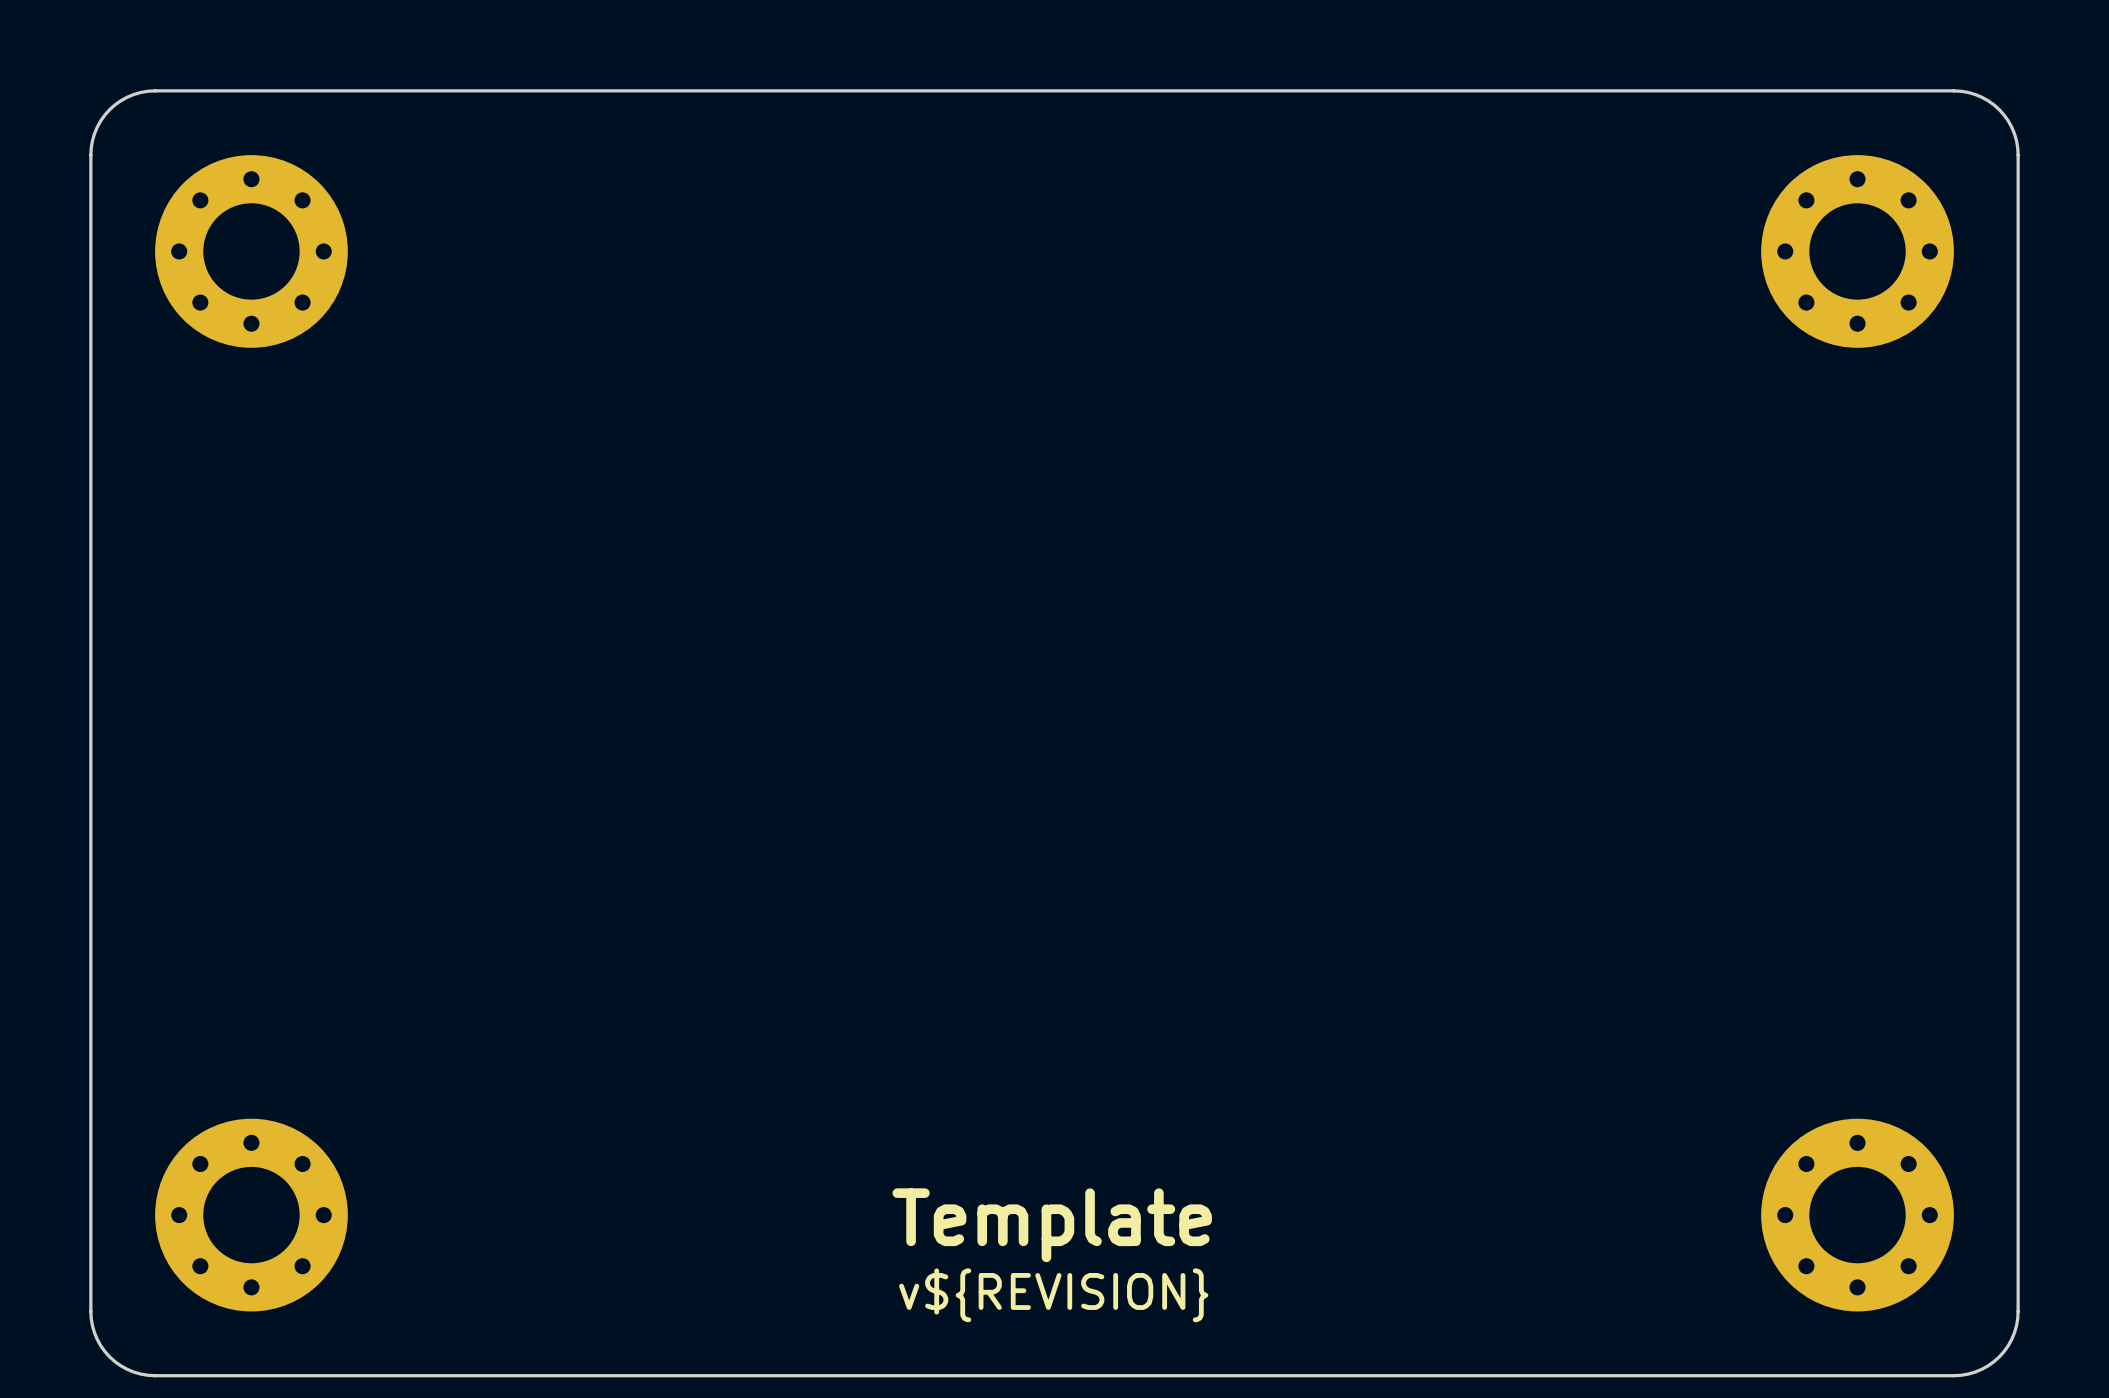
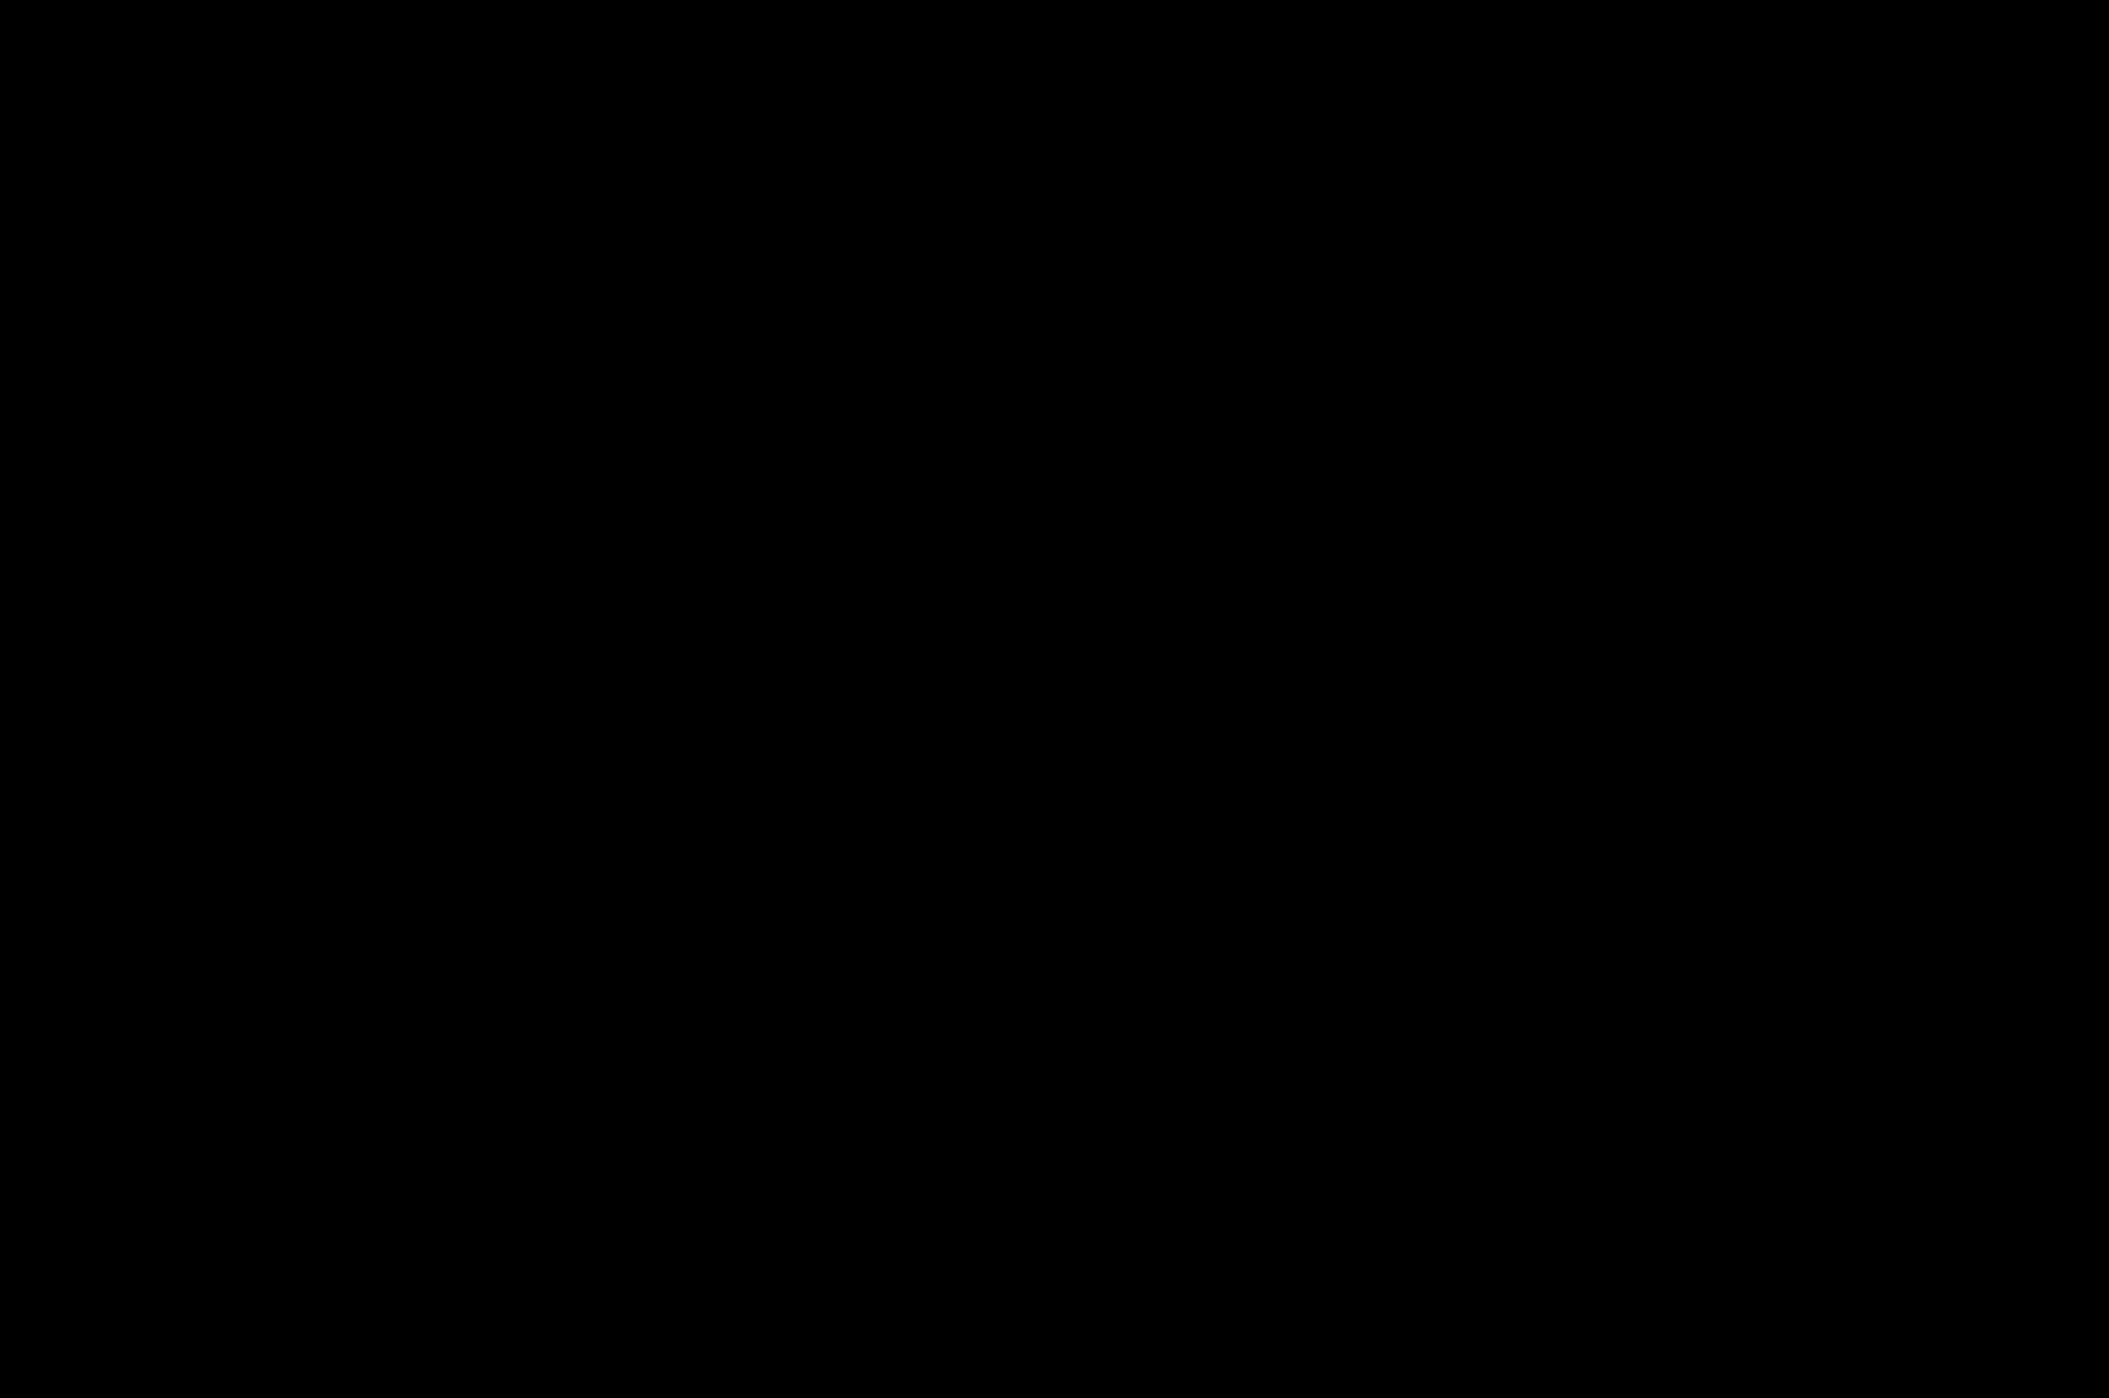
board edge: (155, 90) (1953, 90) (1968, 92) (1988, 100) (1999, 109) (2008, 120) (2014, 133) (2018, 155) (2018, 1311) (2016, 1325) (2008, 1345) (1993, 1361) (1981, 1369) (1968, 1374) (1953, 1375) (155, 1375) (133, 1372) (120, 1365) (109, 1356) (100, 1345) (94, 1332) (90, 1311) (90, 155) (94, 133) (100, 120) (109, 109) (127, 97) (140, 92) (155, 90) -> none
part: (251, 251) -> none
part: (1857, 251) -> none
part: (251, 1215) -> none
part: (1857, 1215) -> none
text: Template (1052, 1225) -> none
text: v${REVISION} (1053, 1295) -> none

